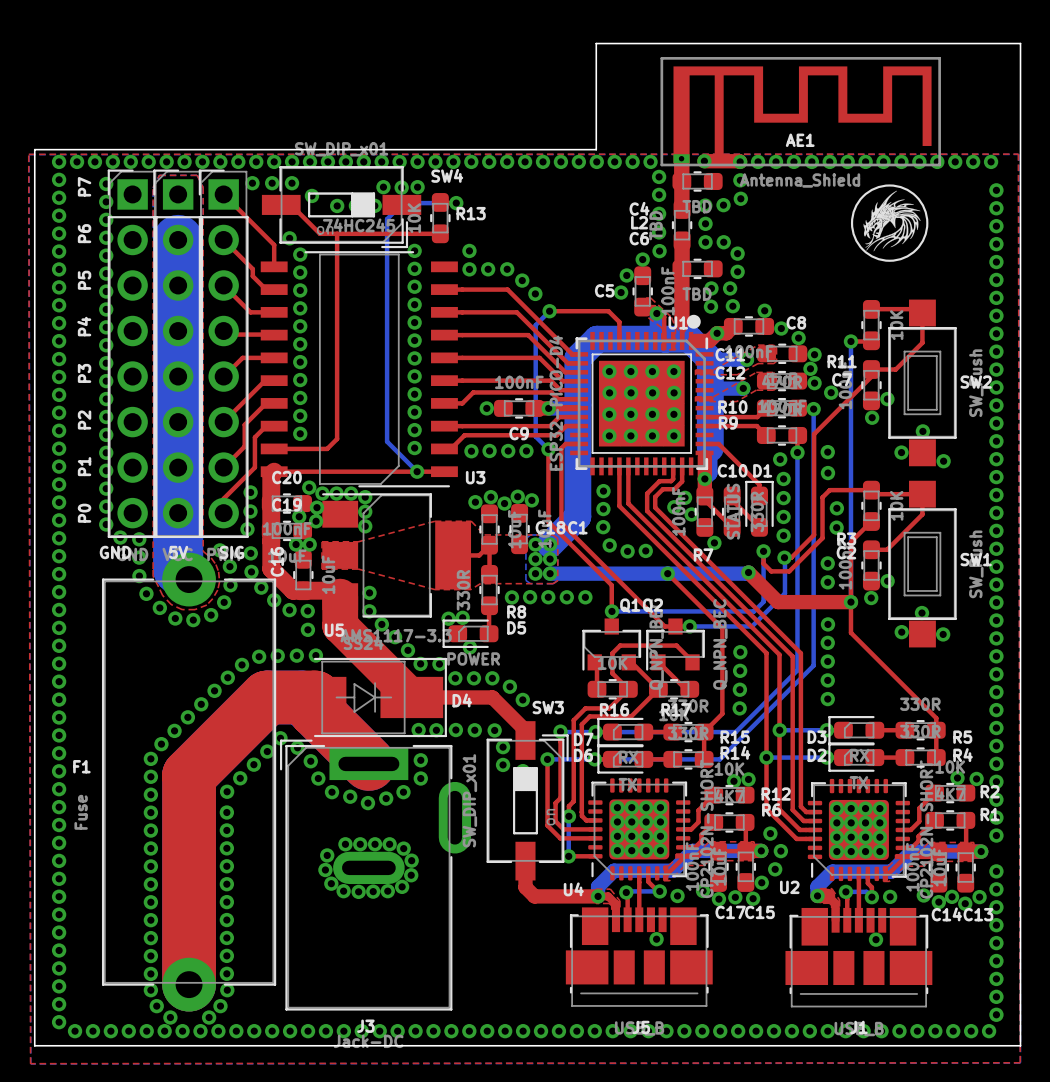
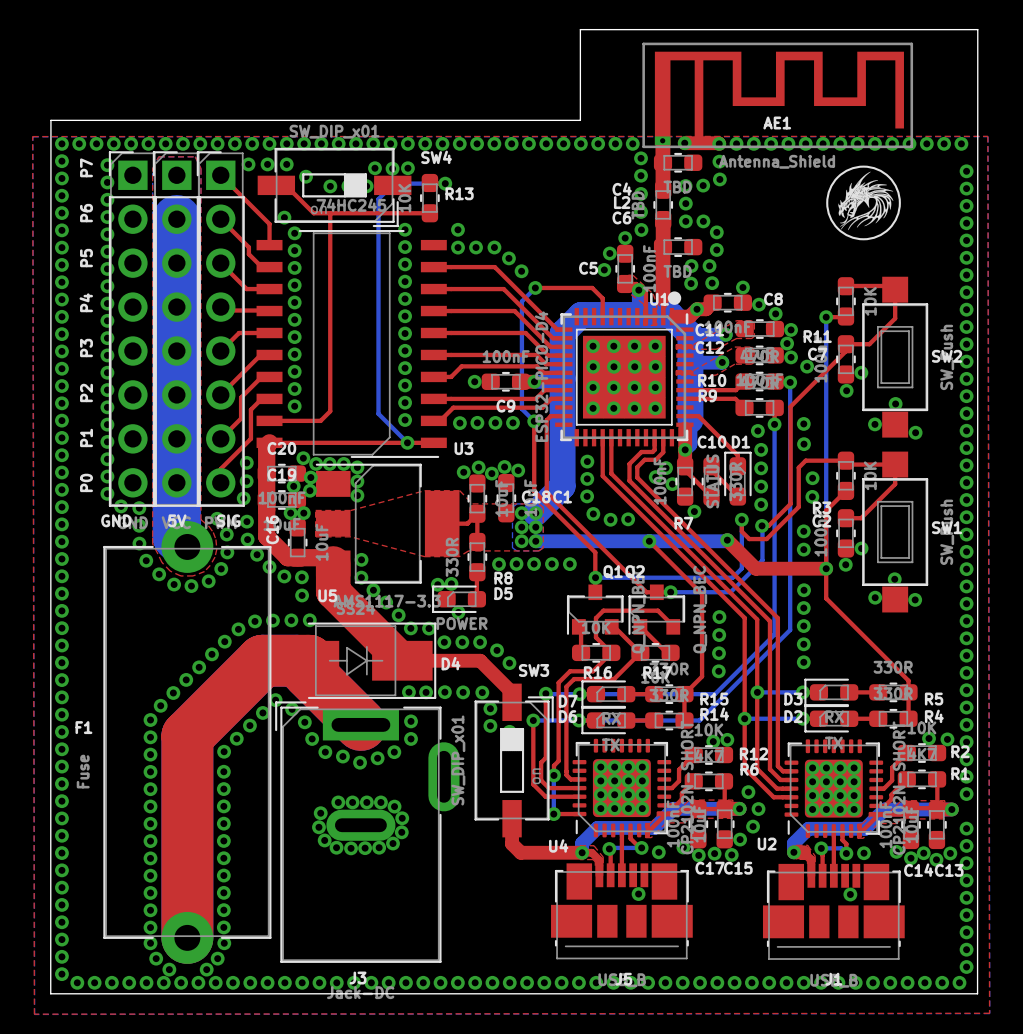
board edge: (1008, 43) (1020, 43) (1020, 1045) (34, 1045) (34, 149) (596, 149) (596, 137) -> (977, 29) (977, 993) (50, 993) (50, 120) (580, 120)

